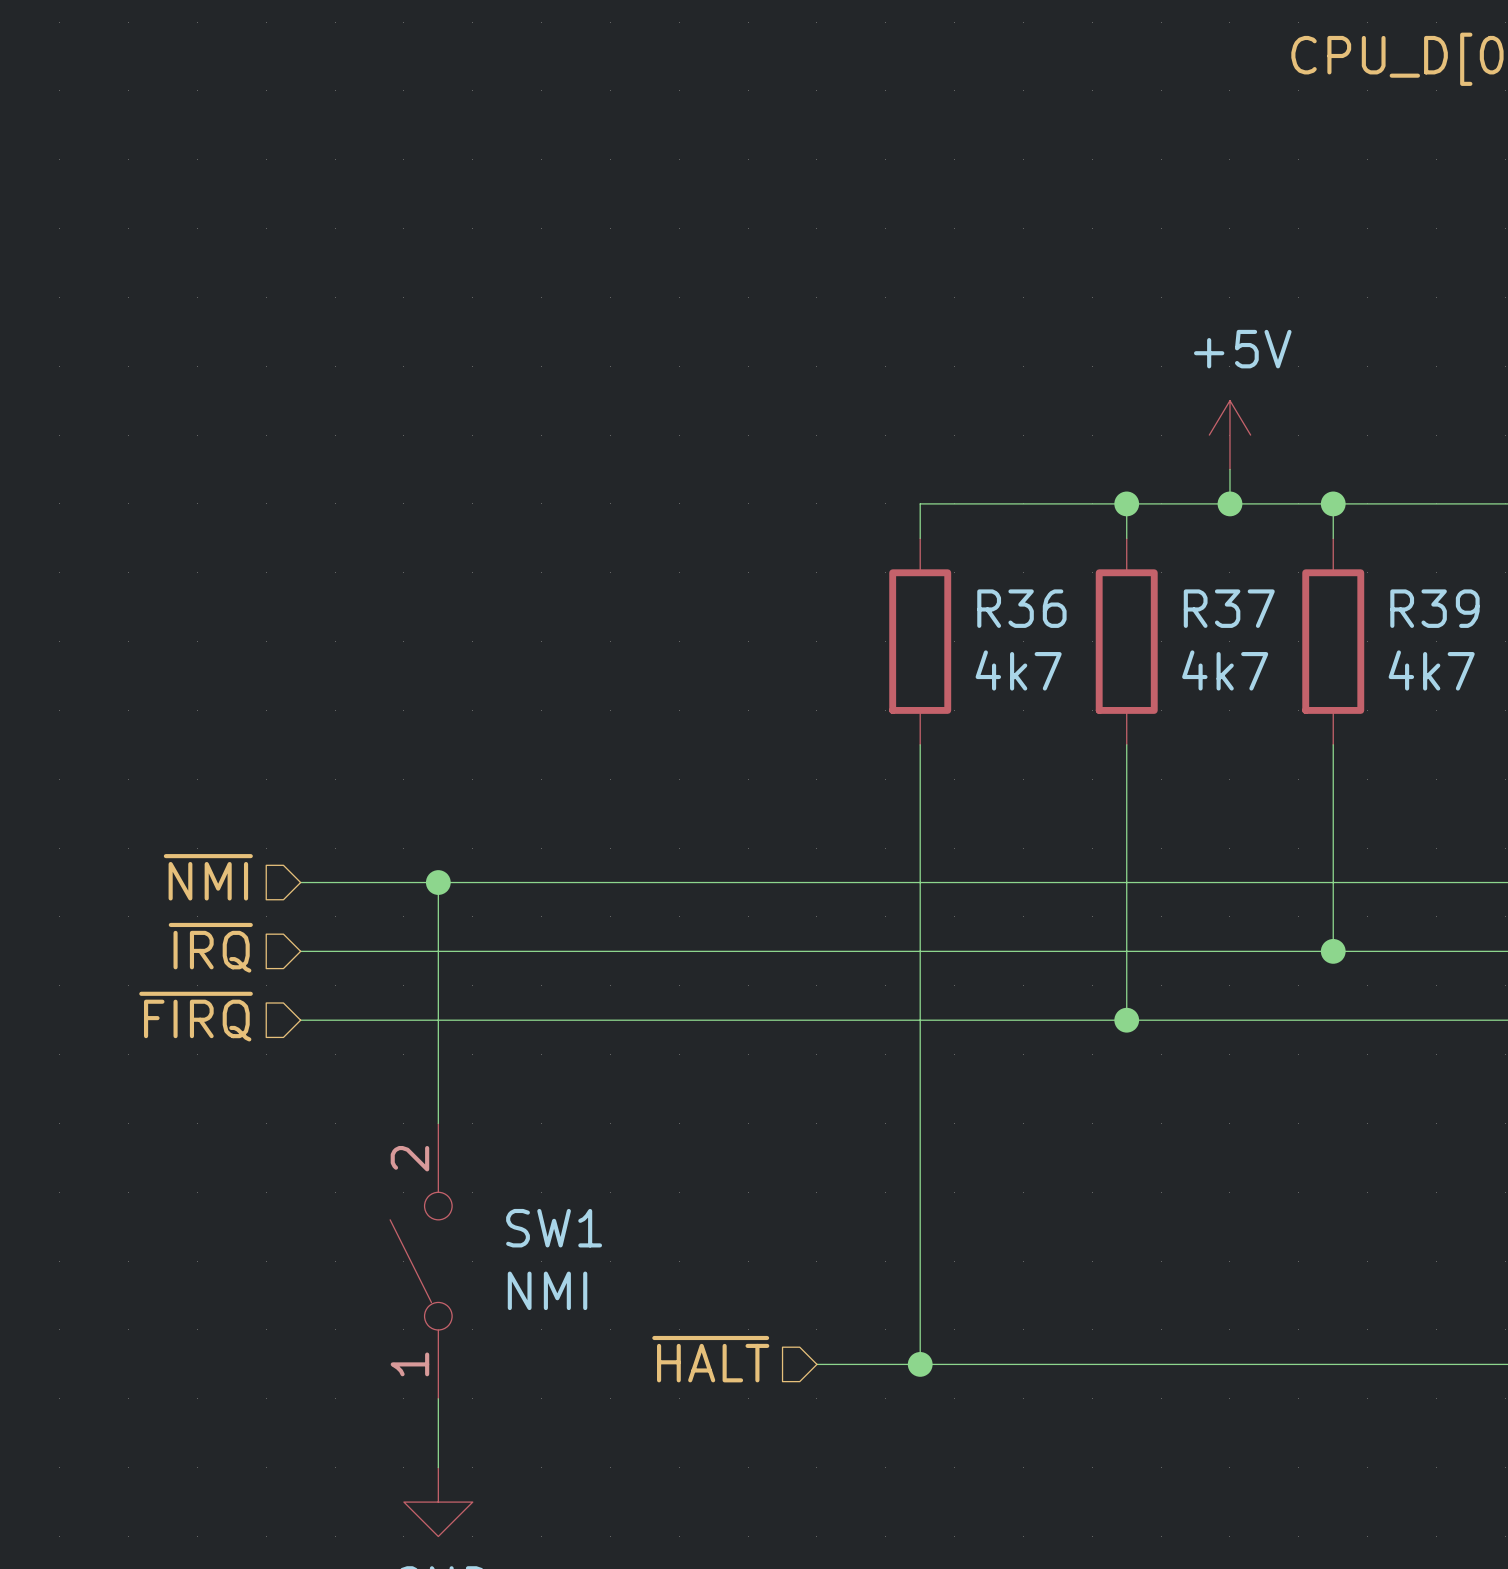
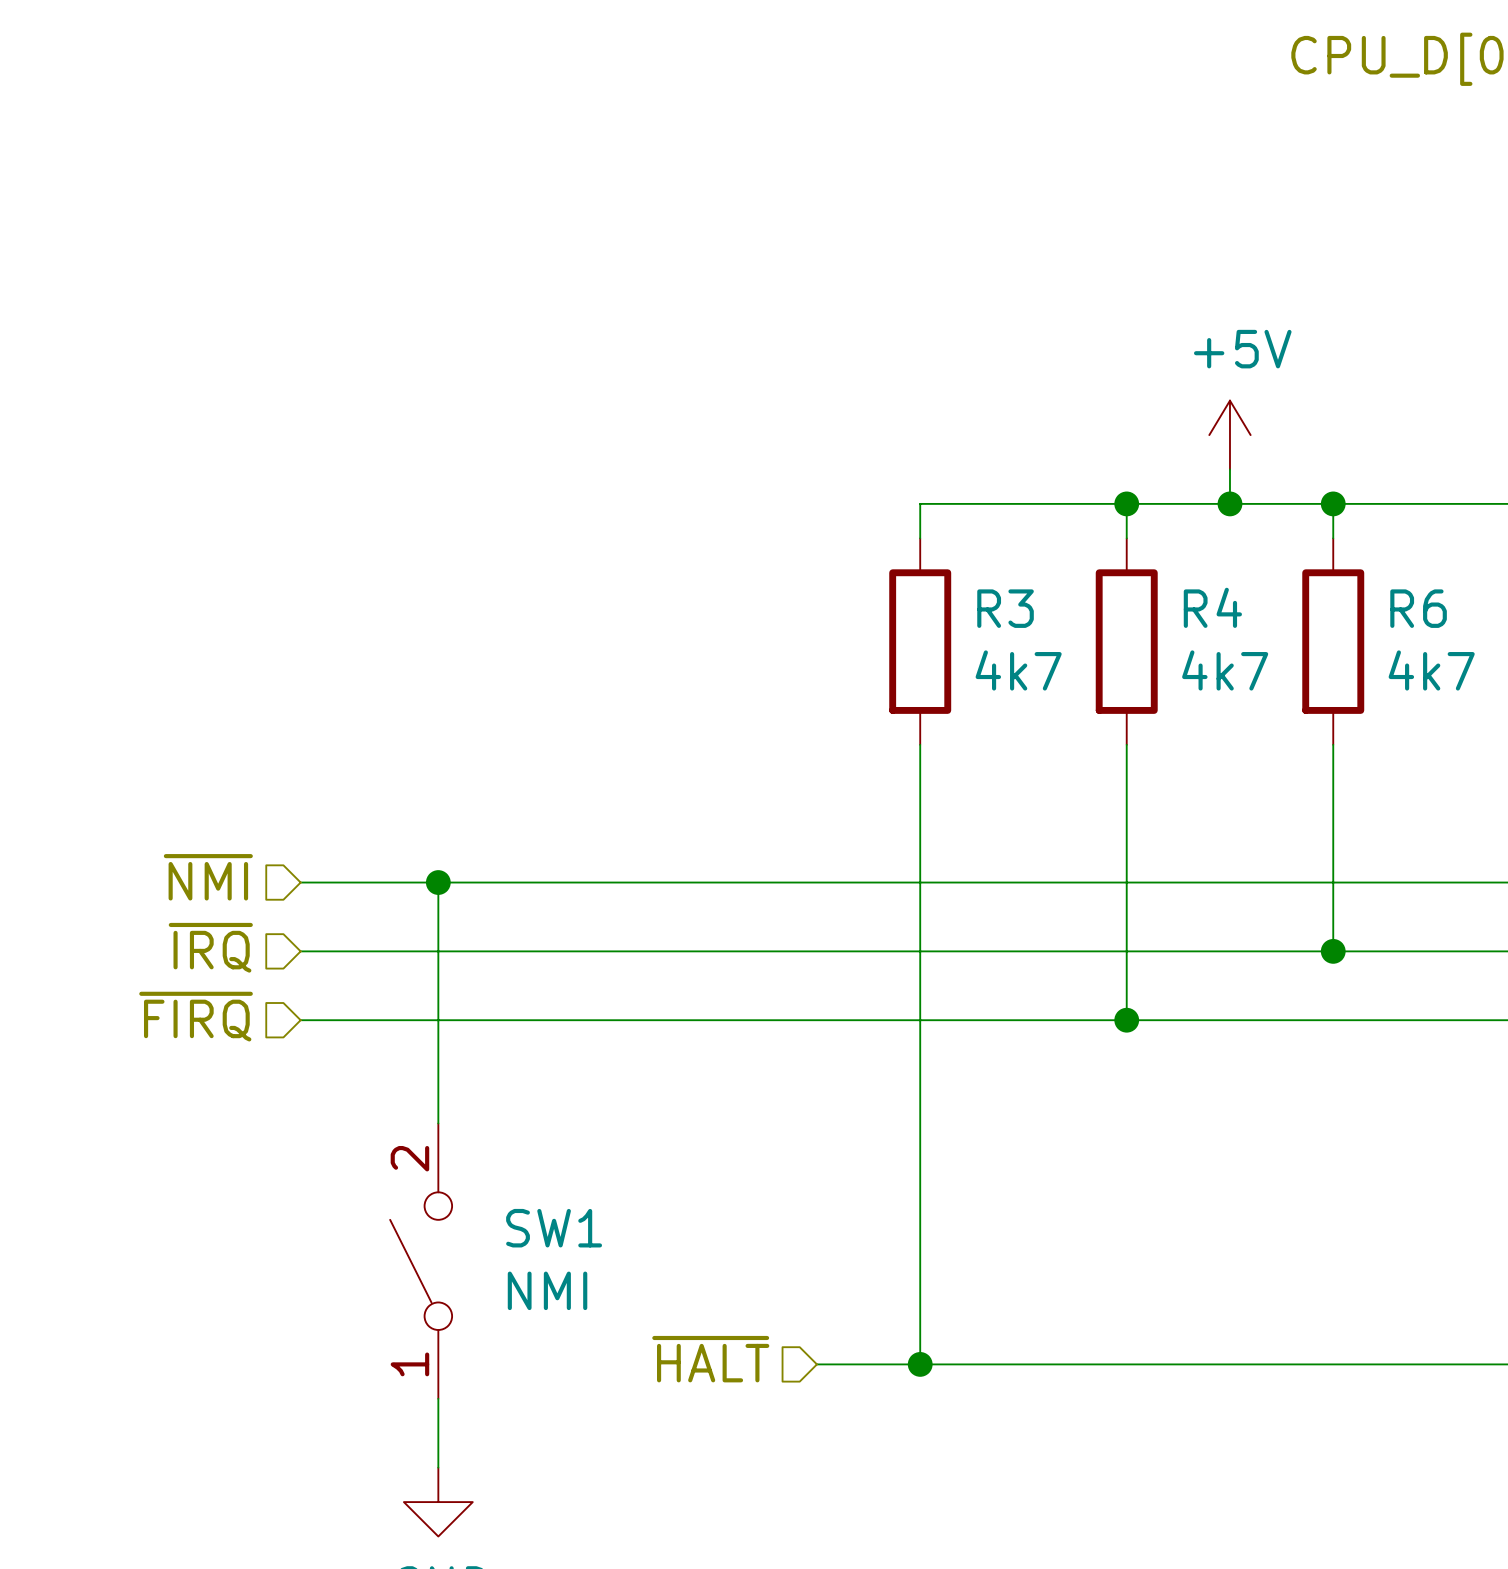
R36 name: R36 (1021, 608) -> R3 (1005, 608)
R37 name: R37 (1229, 608) -> R4 (1212, 607)
R39 name: R39 (1434, 608) -> R6 (1418, 608)

